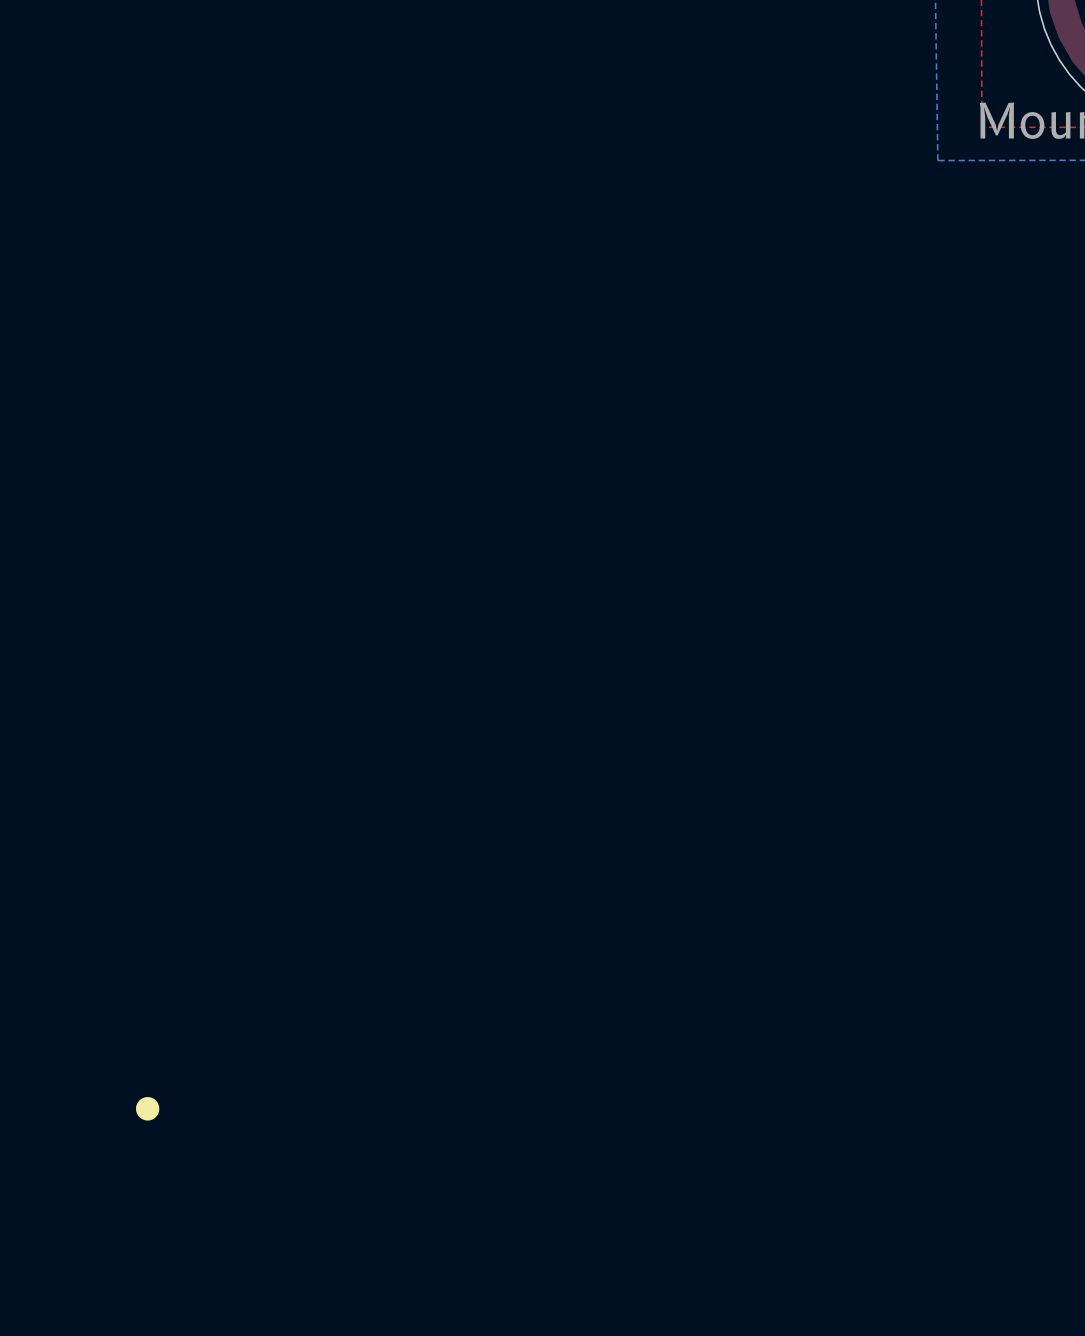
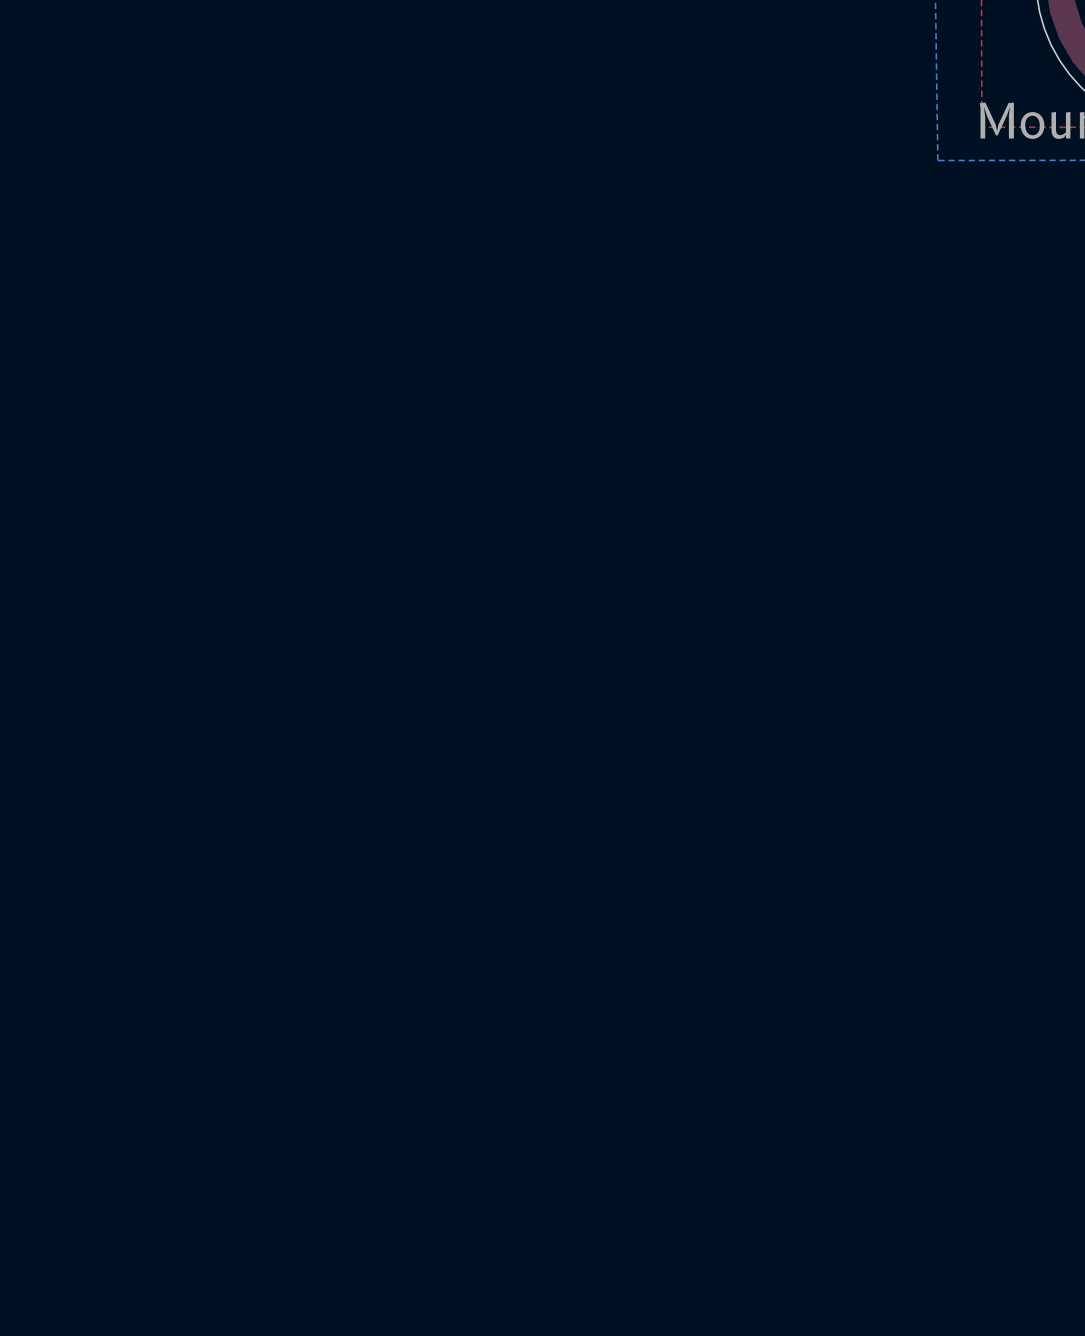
text: . (147, 1108) -> none

